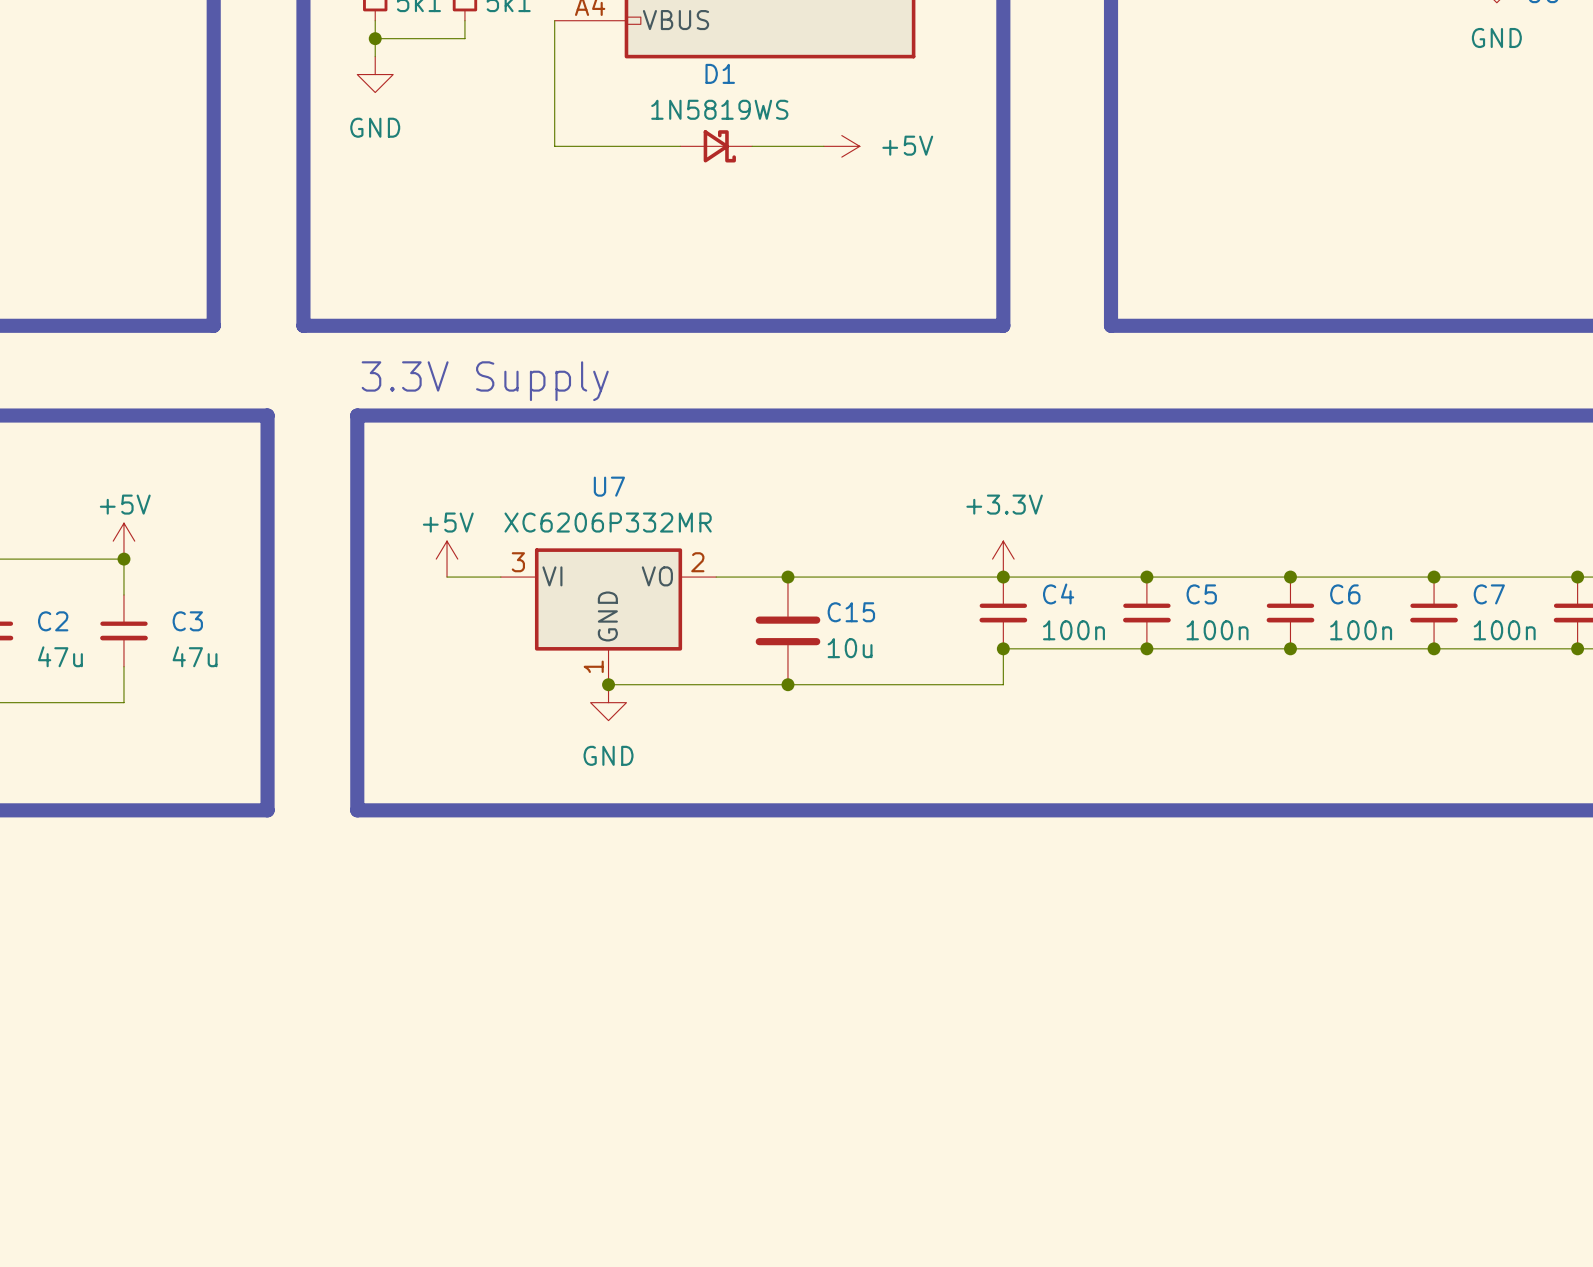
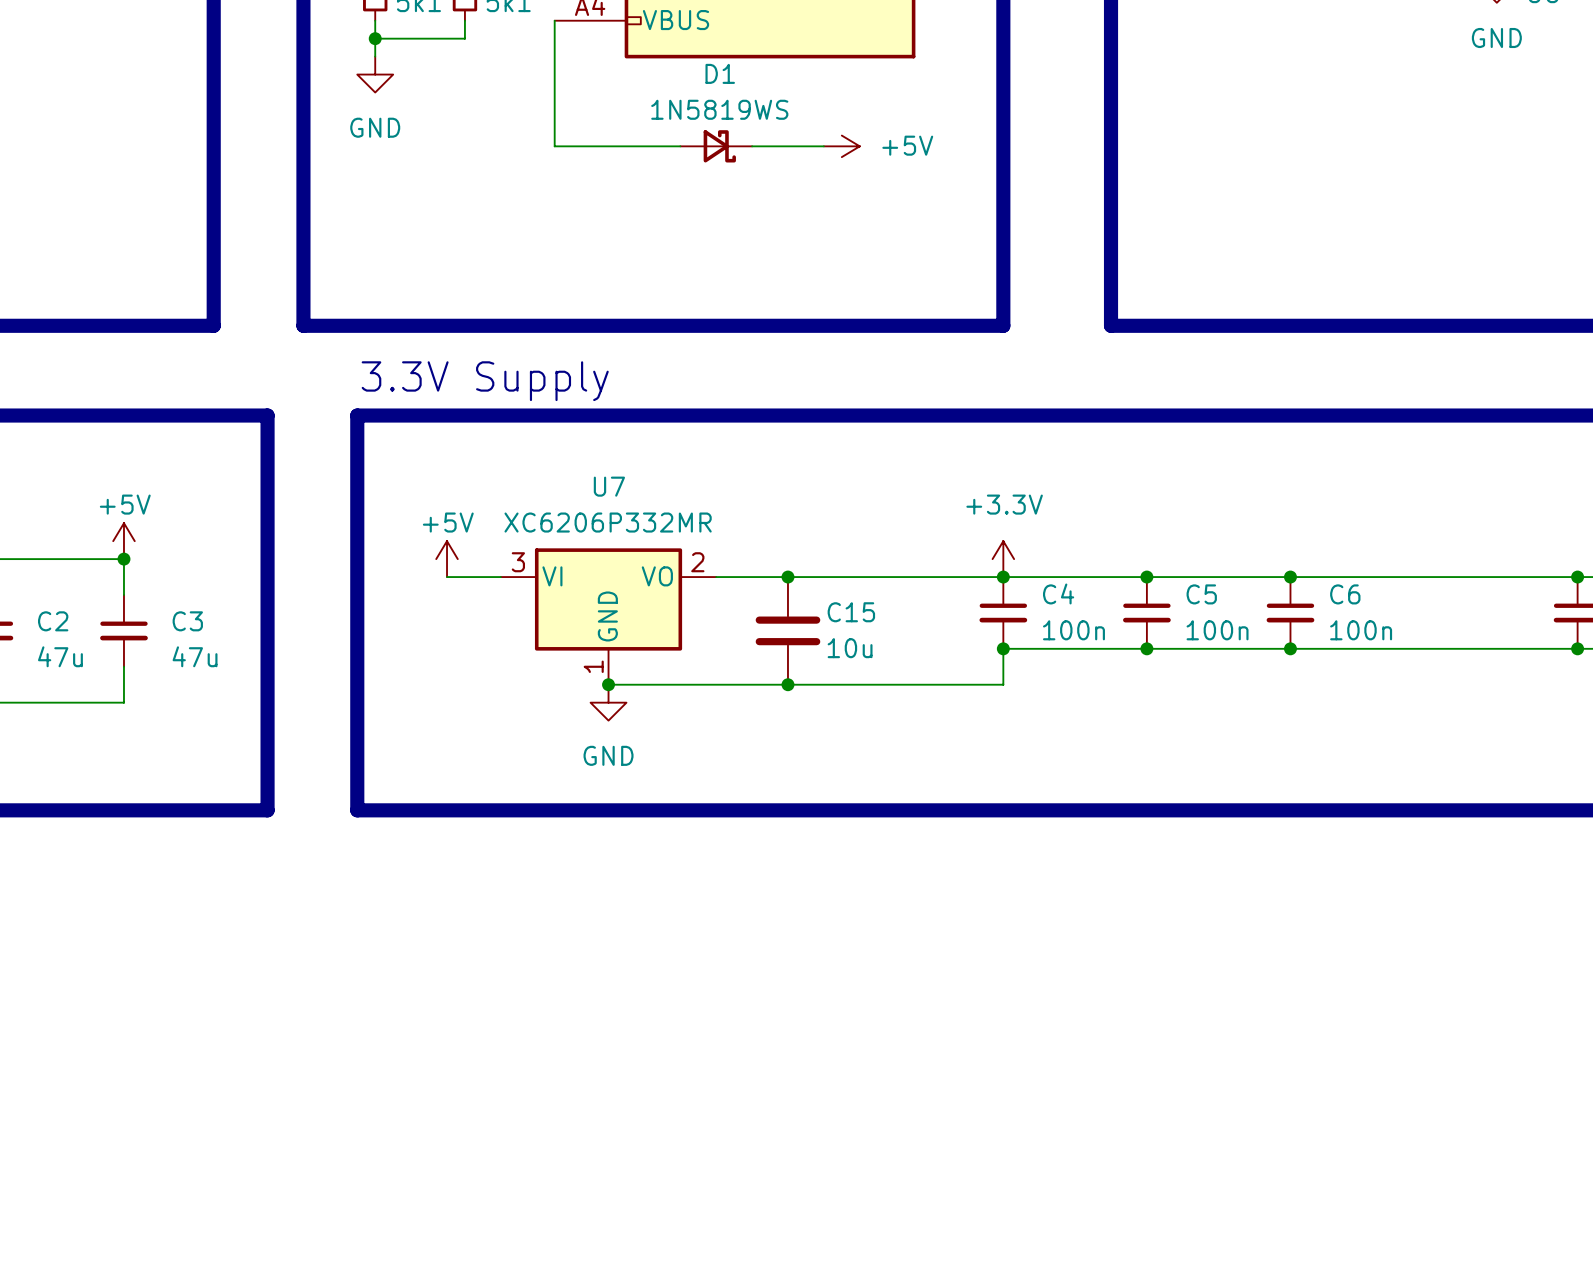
junction: (1434, 577) -> none
C7: 100n (1434, 612) -> none
junction: (1434, 648) -> none

